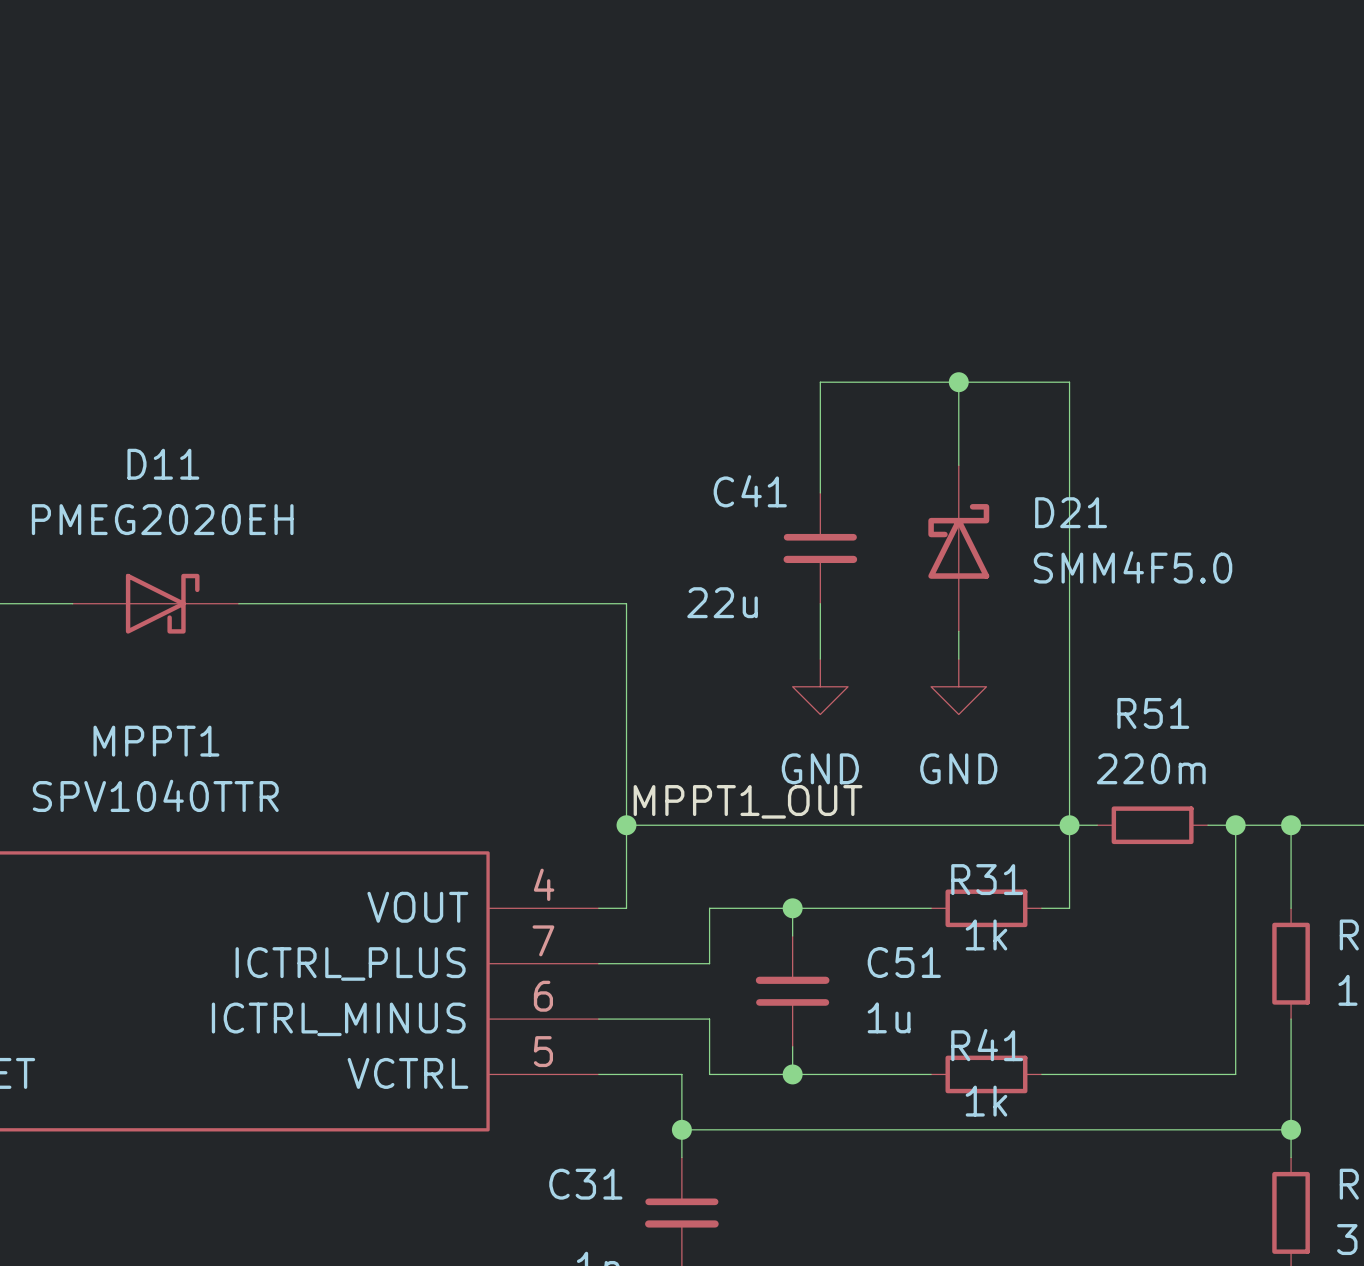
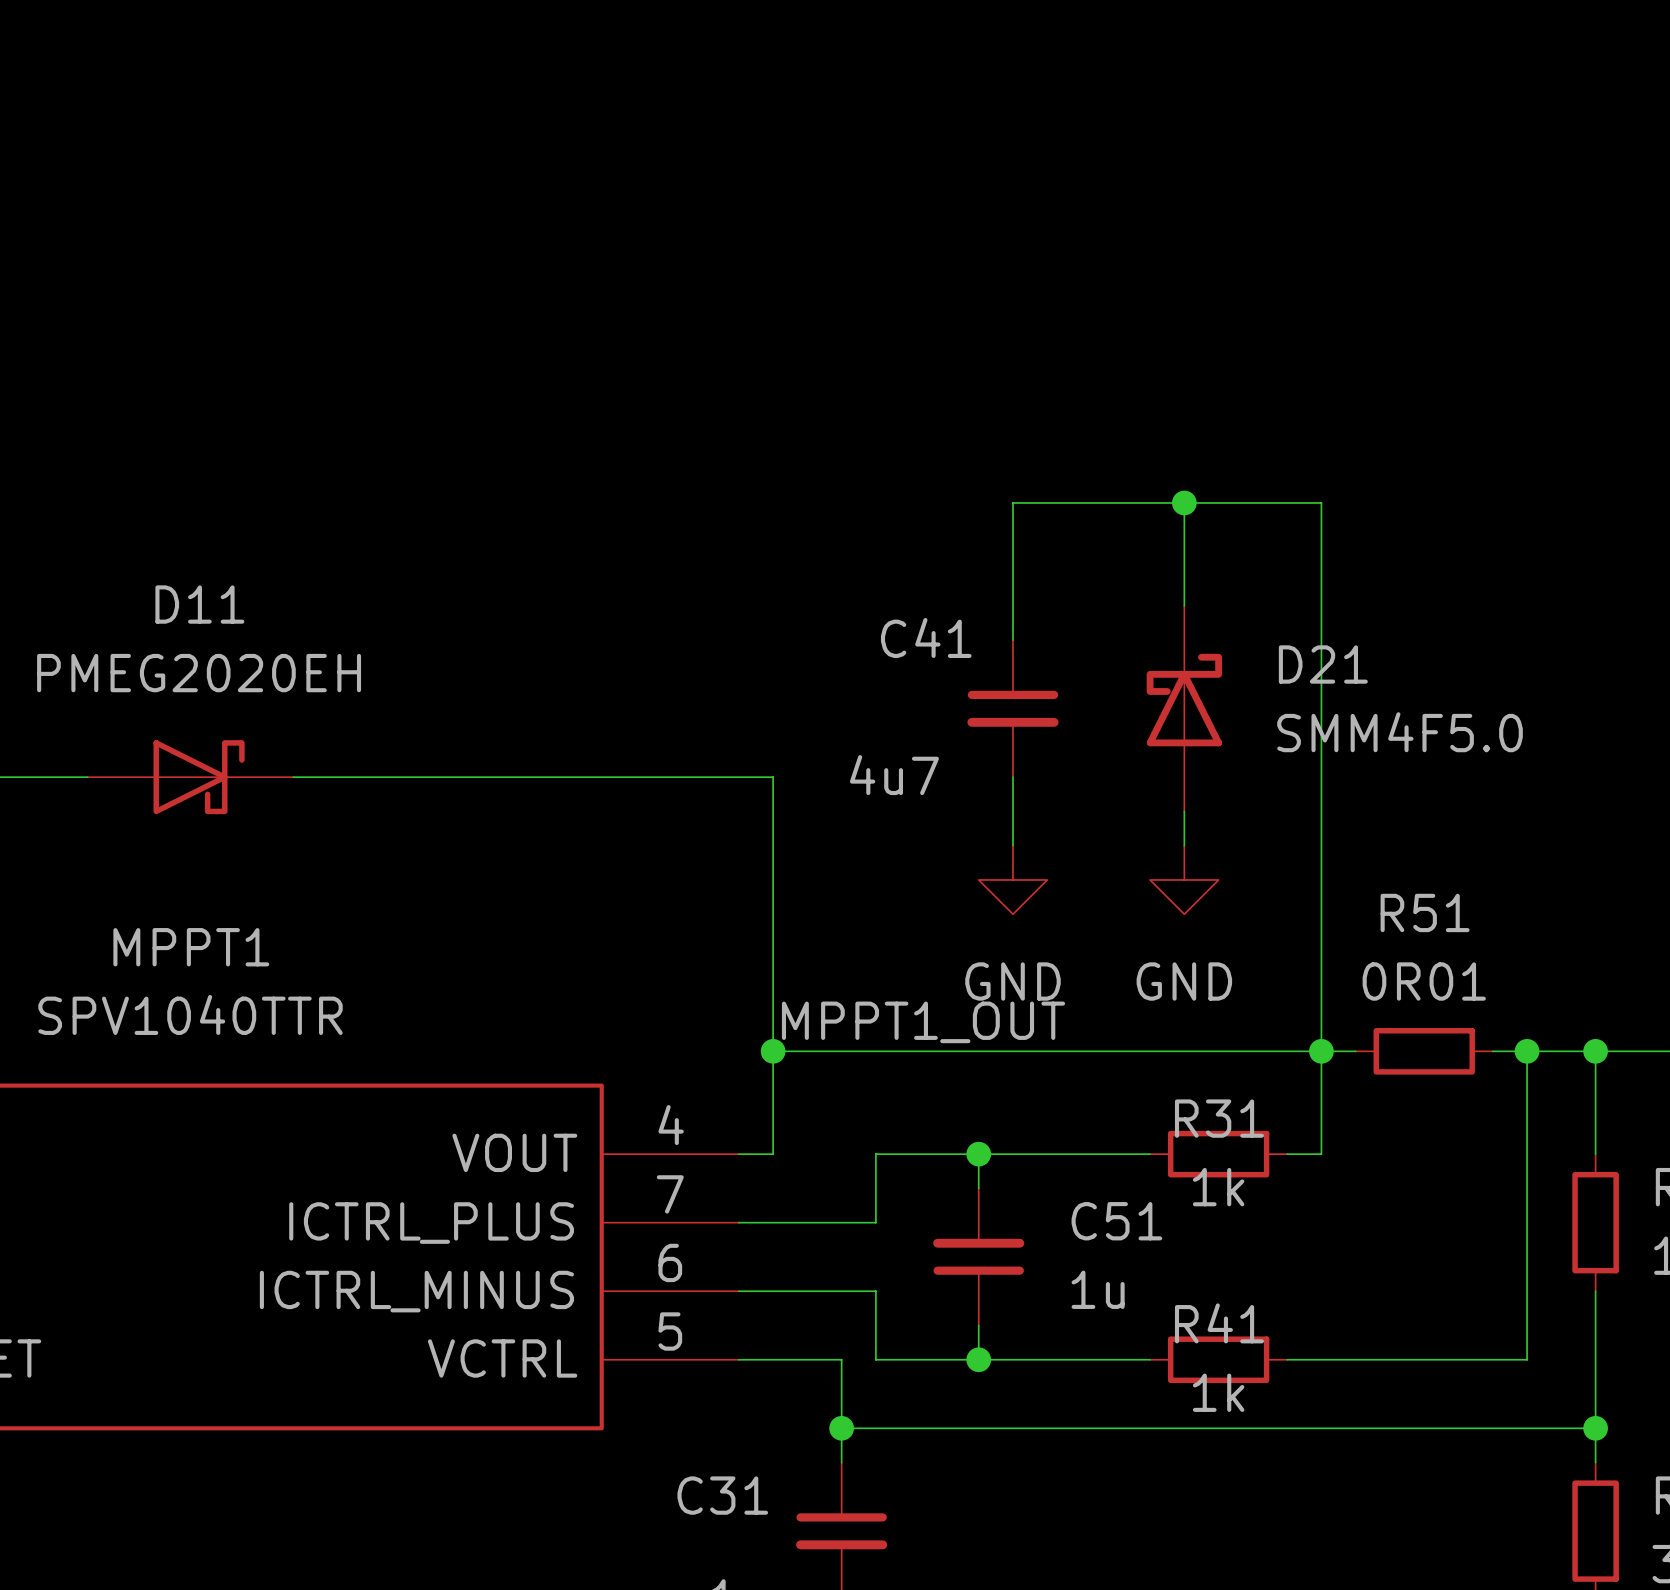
C41 value: 22u (722, 602) -> 4u7 (894, 775)
R51 value: 220m (1151, 768) -> 0R01 (1424, 981)

